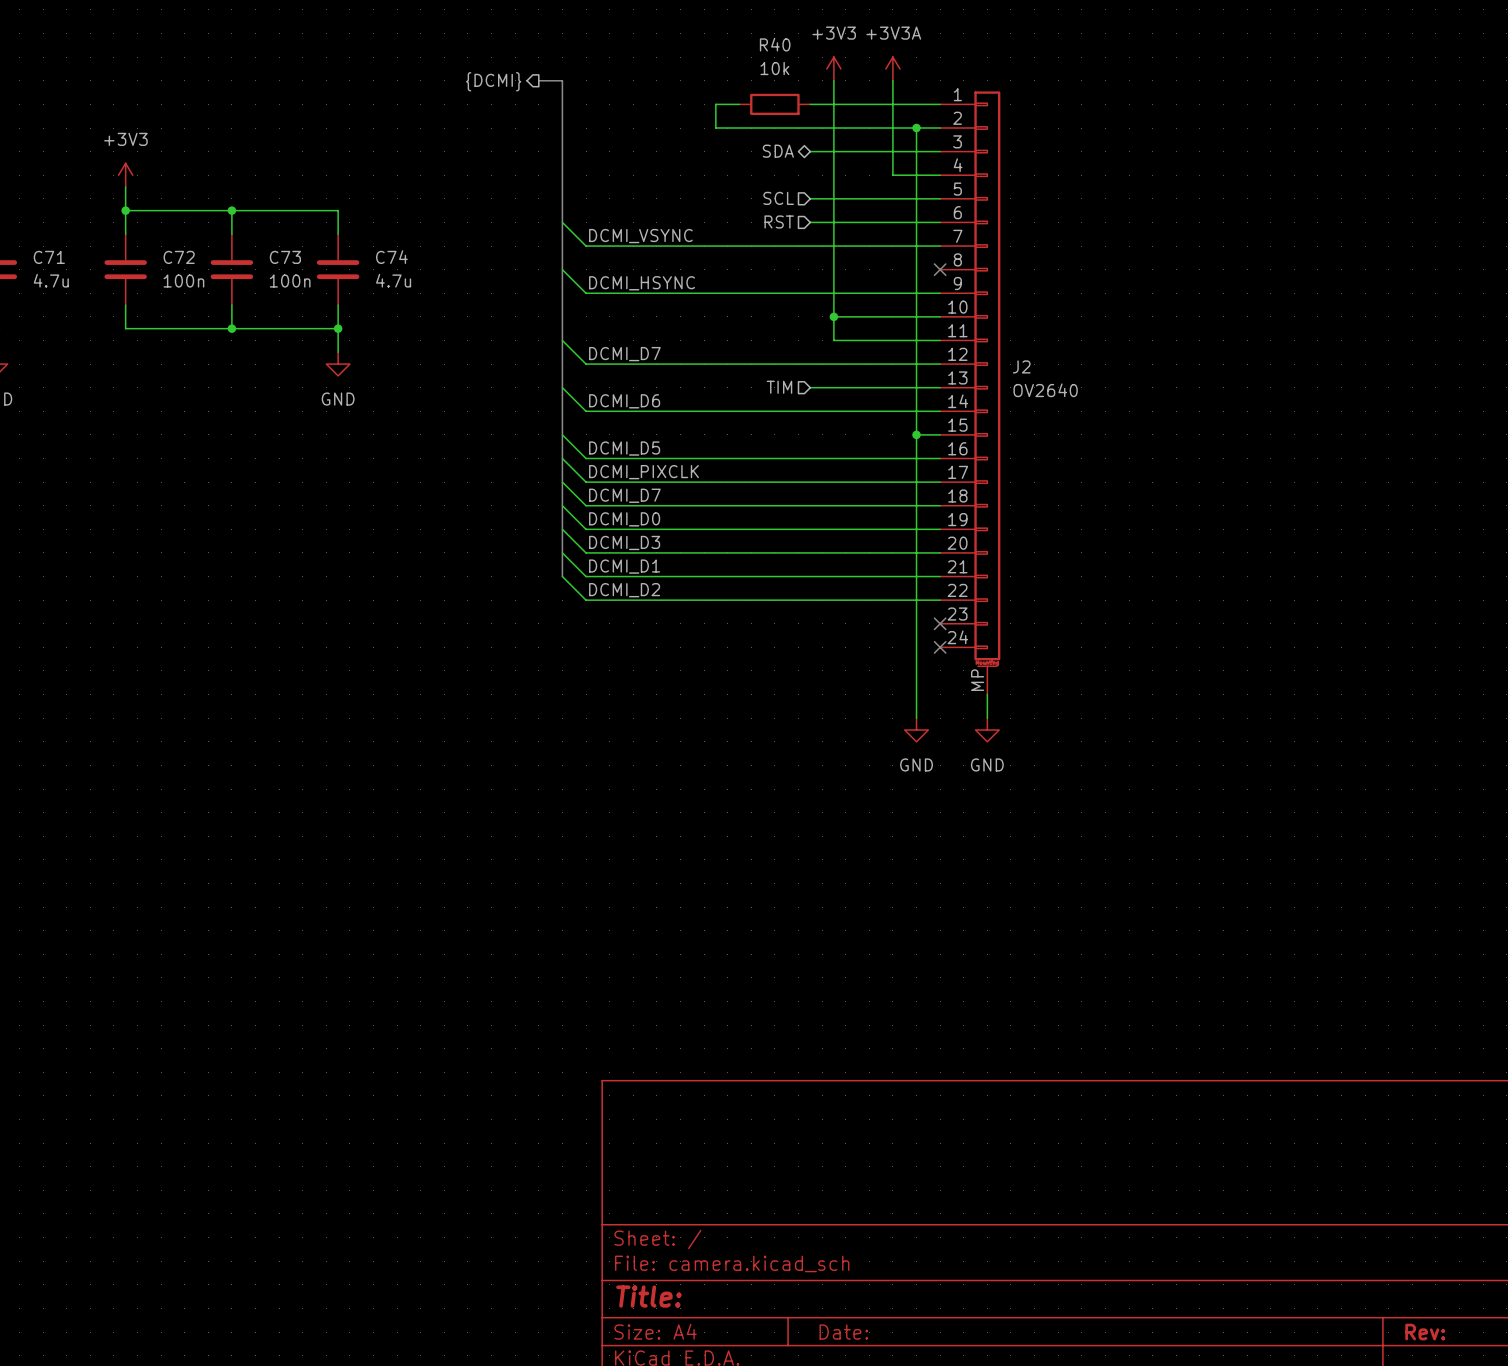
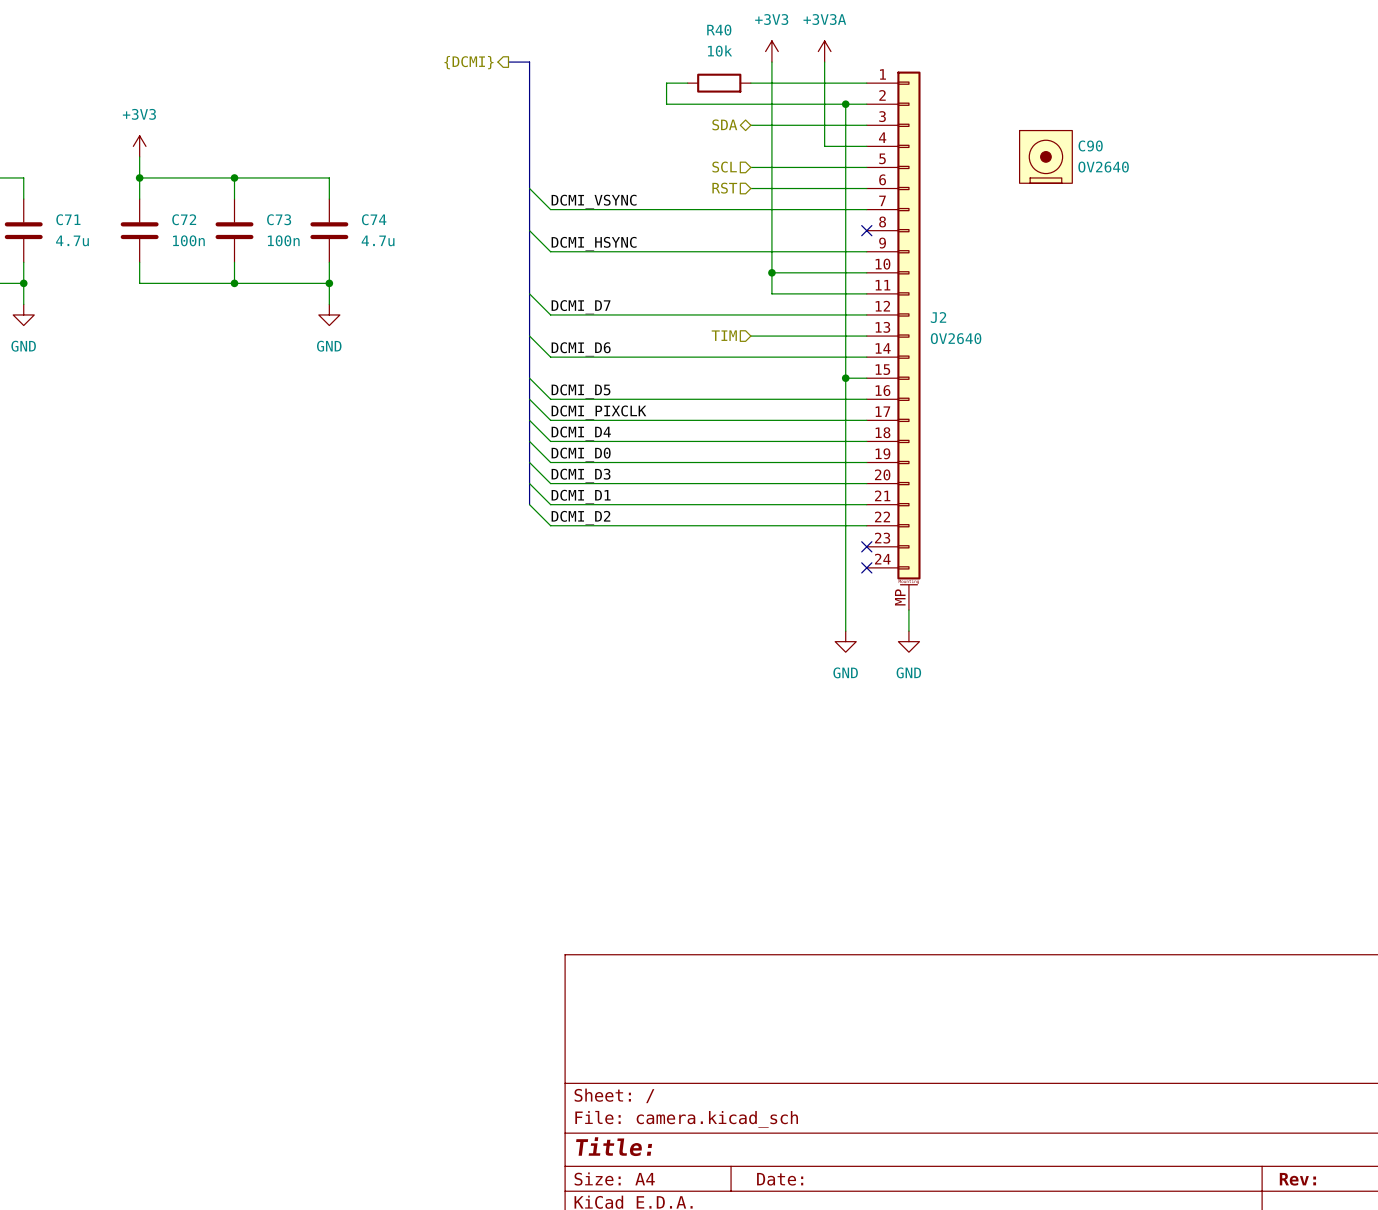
C90: none -> OV2640 (1045, 156)
label: DCMI_D7 (624, 495) -> DCMI_D4 (581, 433)

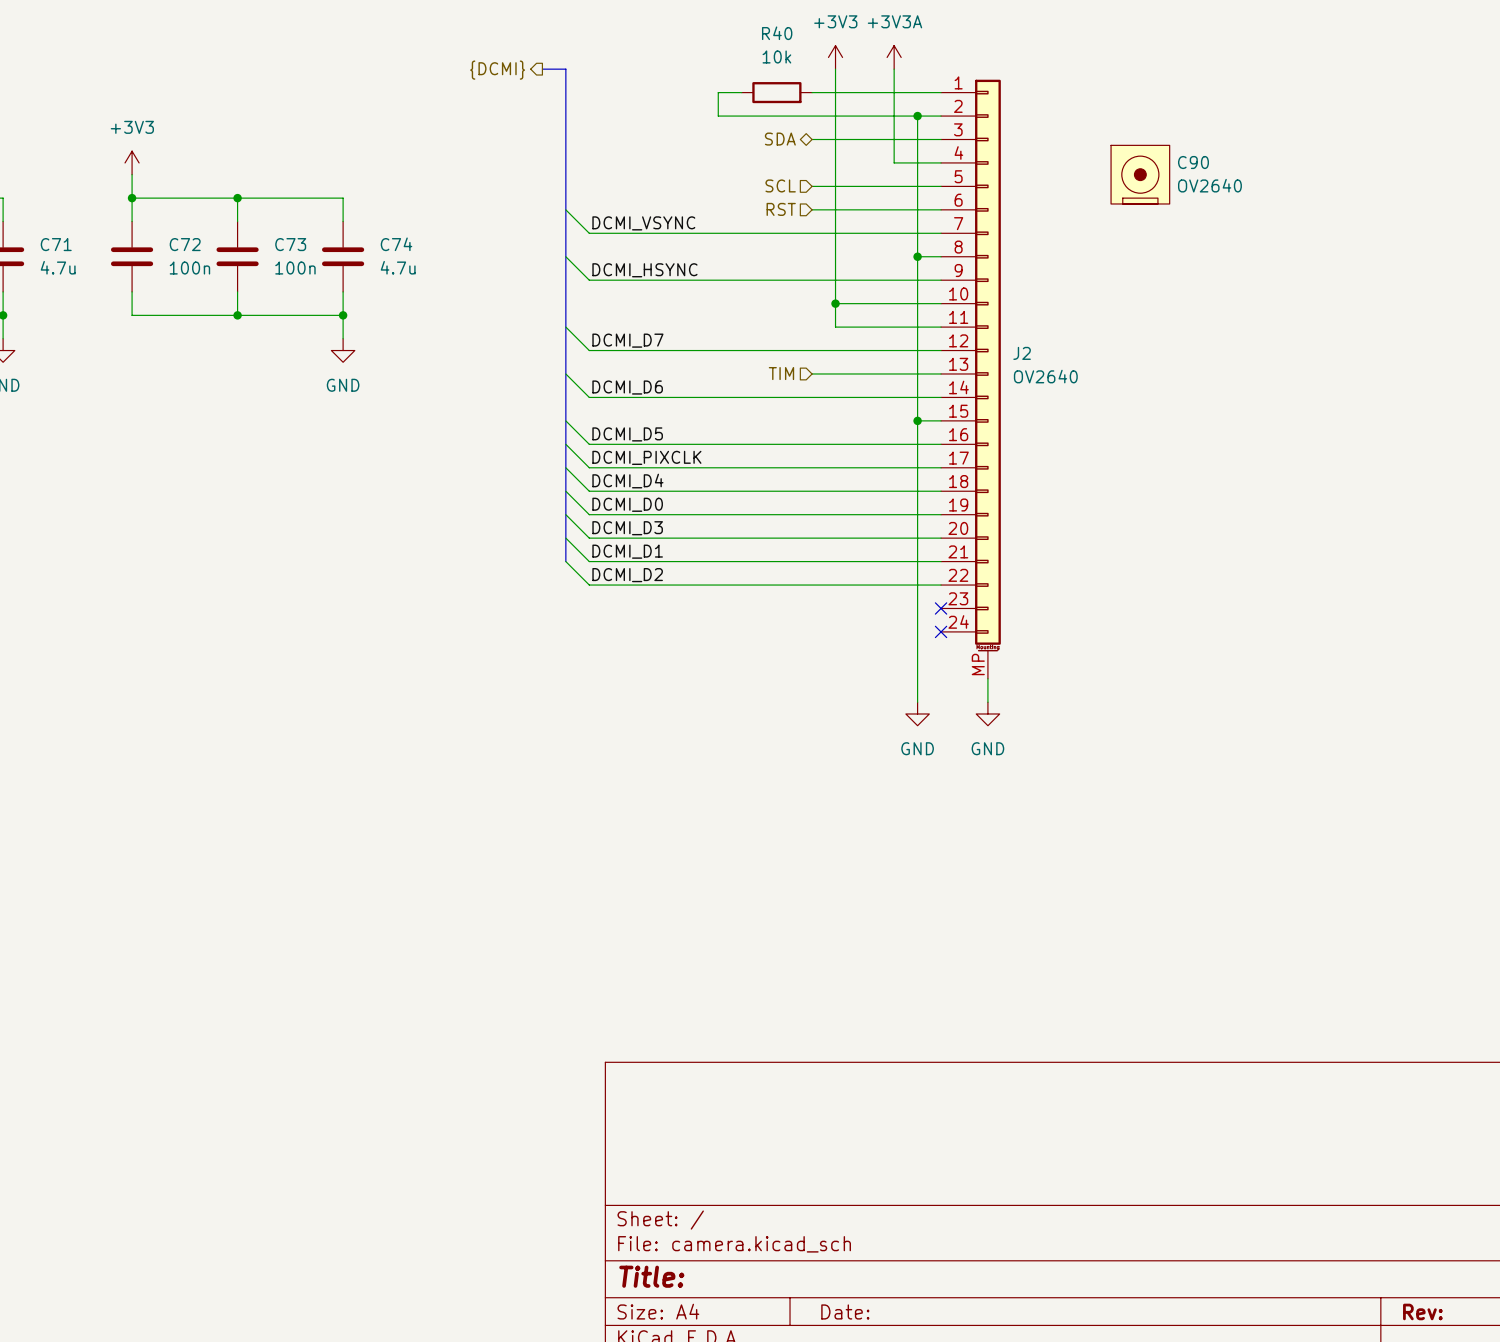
wire: none -> (917, 256) (941, 256)
junction: none -> (917, 256)
no-connect mark: (866, 230) -> none

